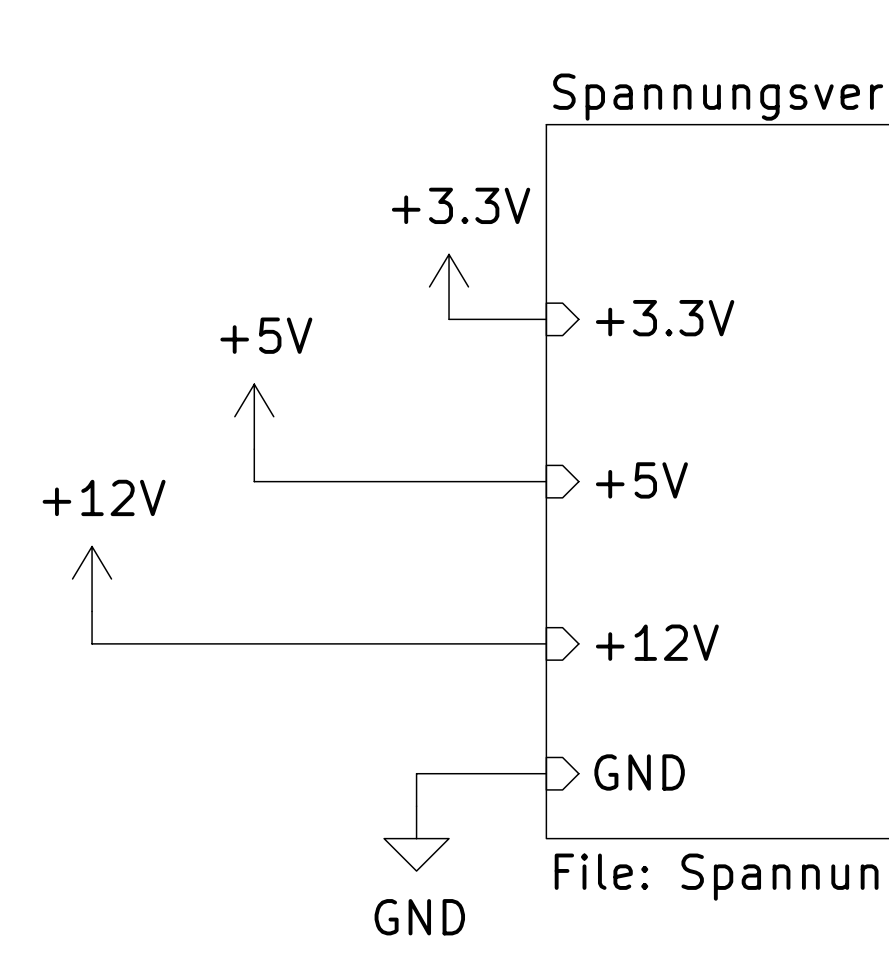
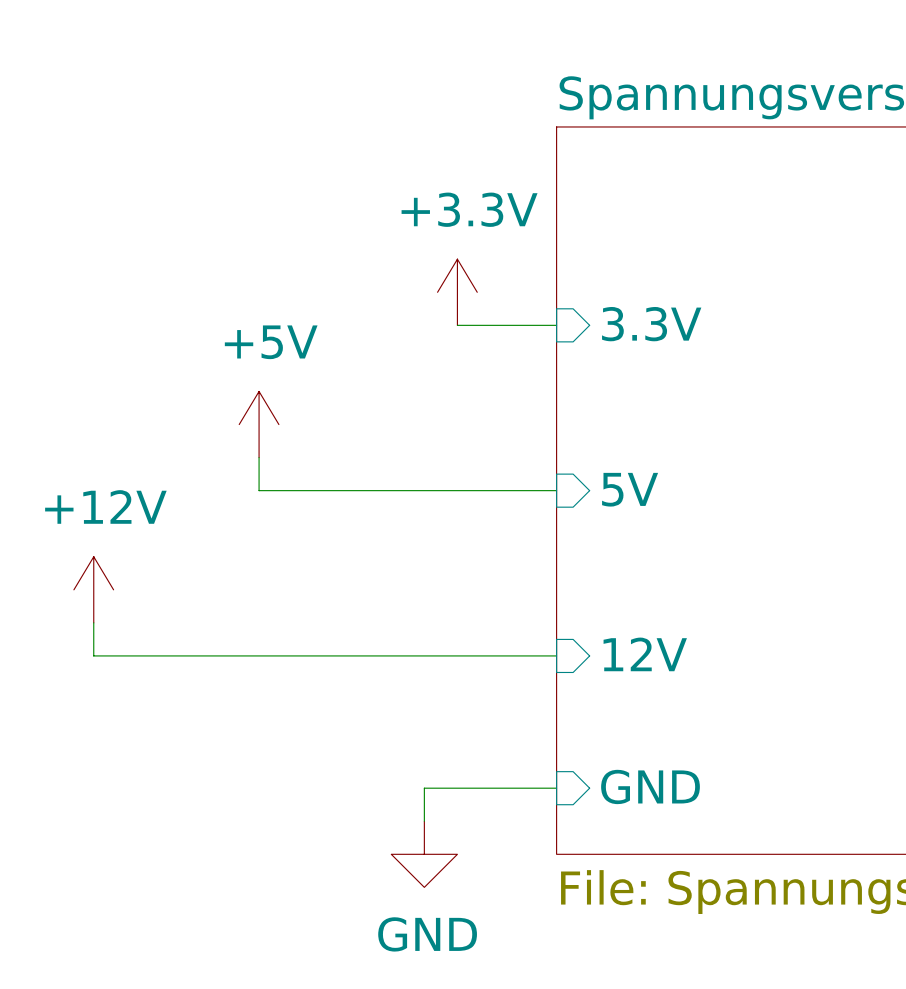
sheet pin: +3.3V (665, 318) -> 3.3V (651, 324)
sheet pin: +5V (641, 480) -> 5V (630, 489)
sheet pin: +12V (657, 642) -> 12V (645, 654)

